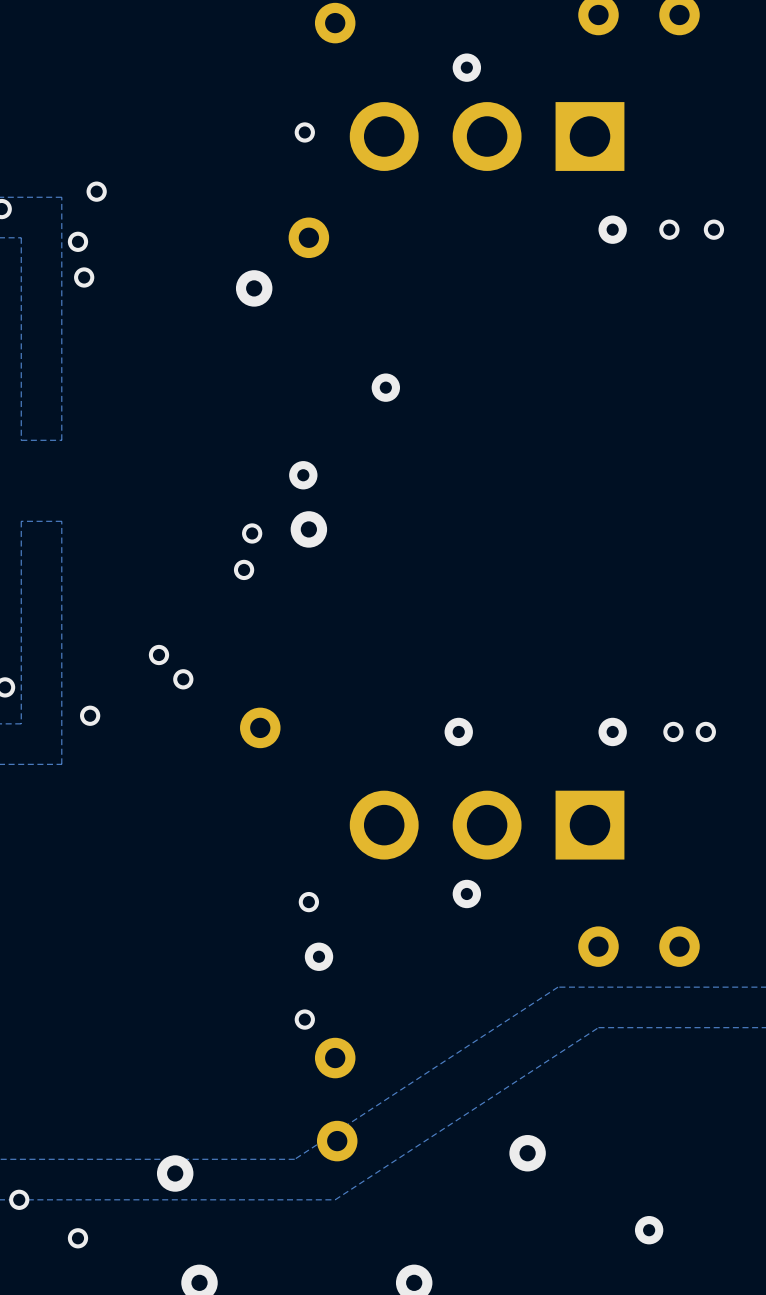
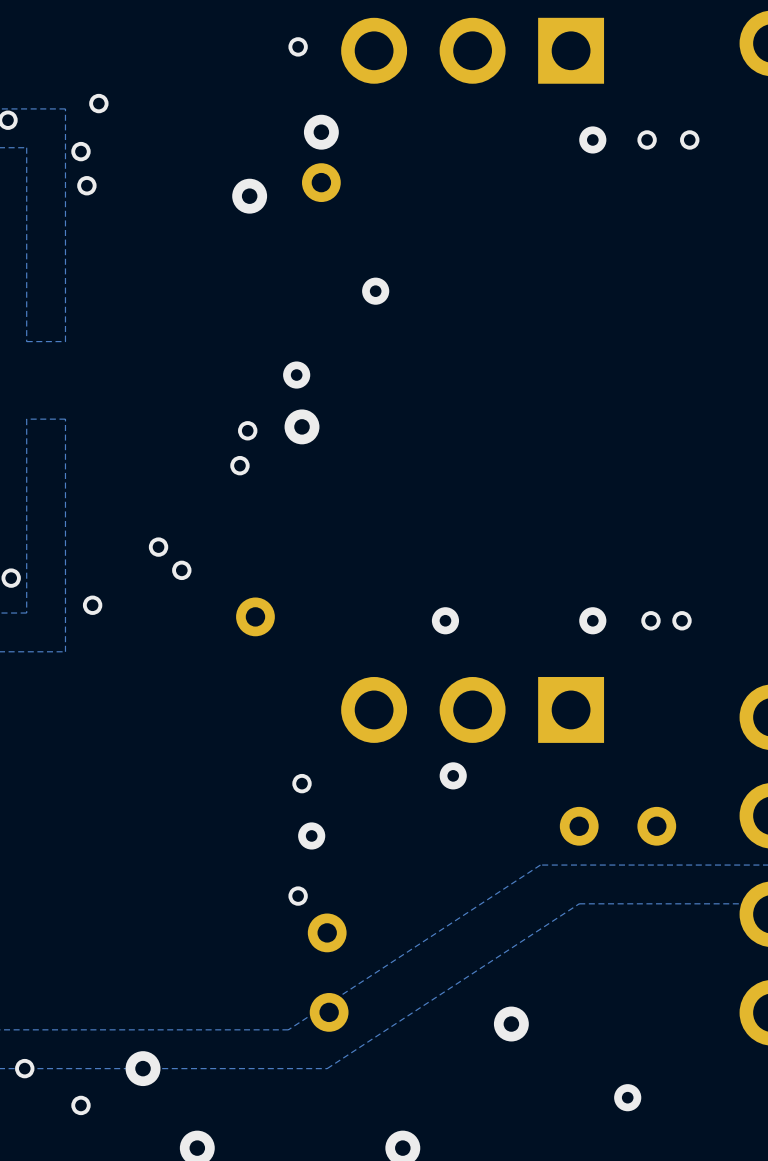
via: none -> (321, 132)
part position: (308, 237) -> (321, 182)
via position: (175, 1173) -> (143, 1068)

